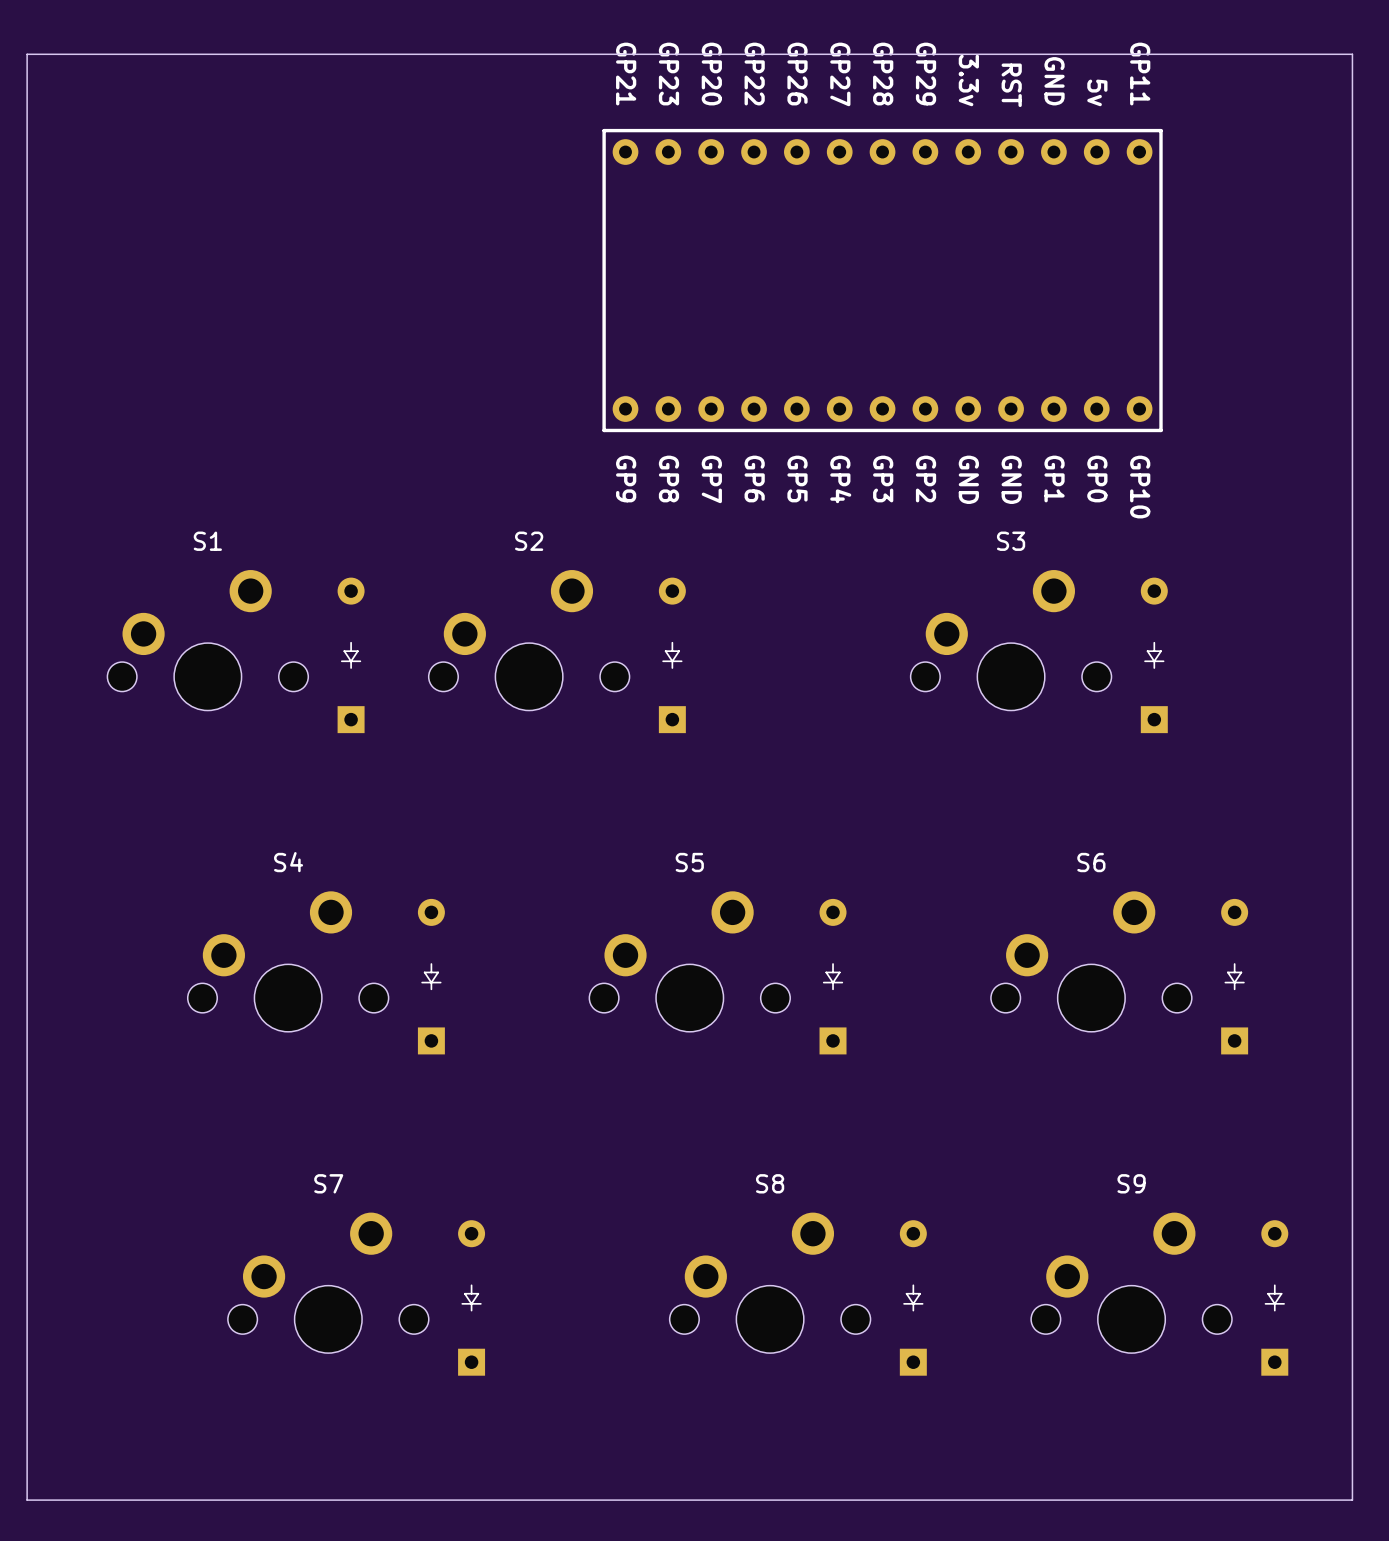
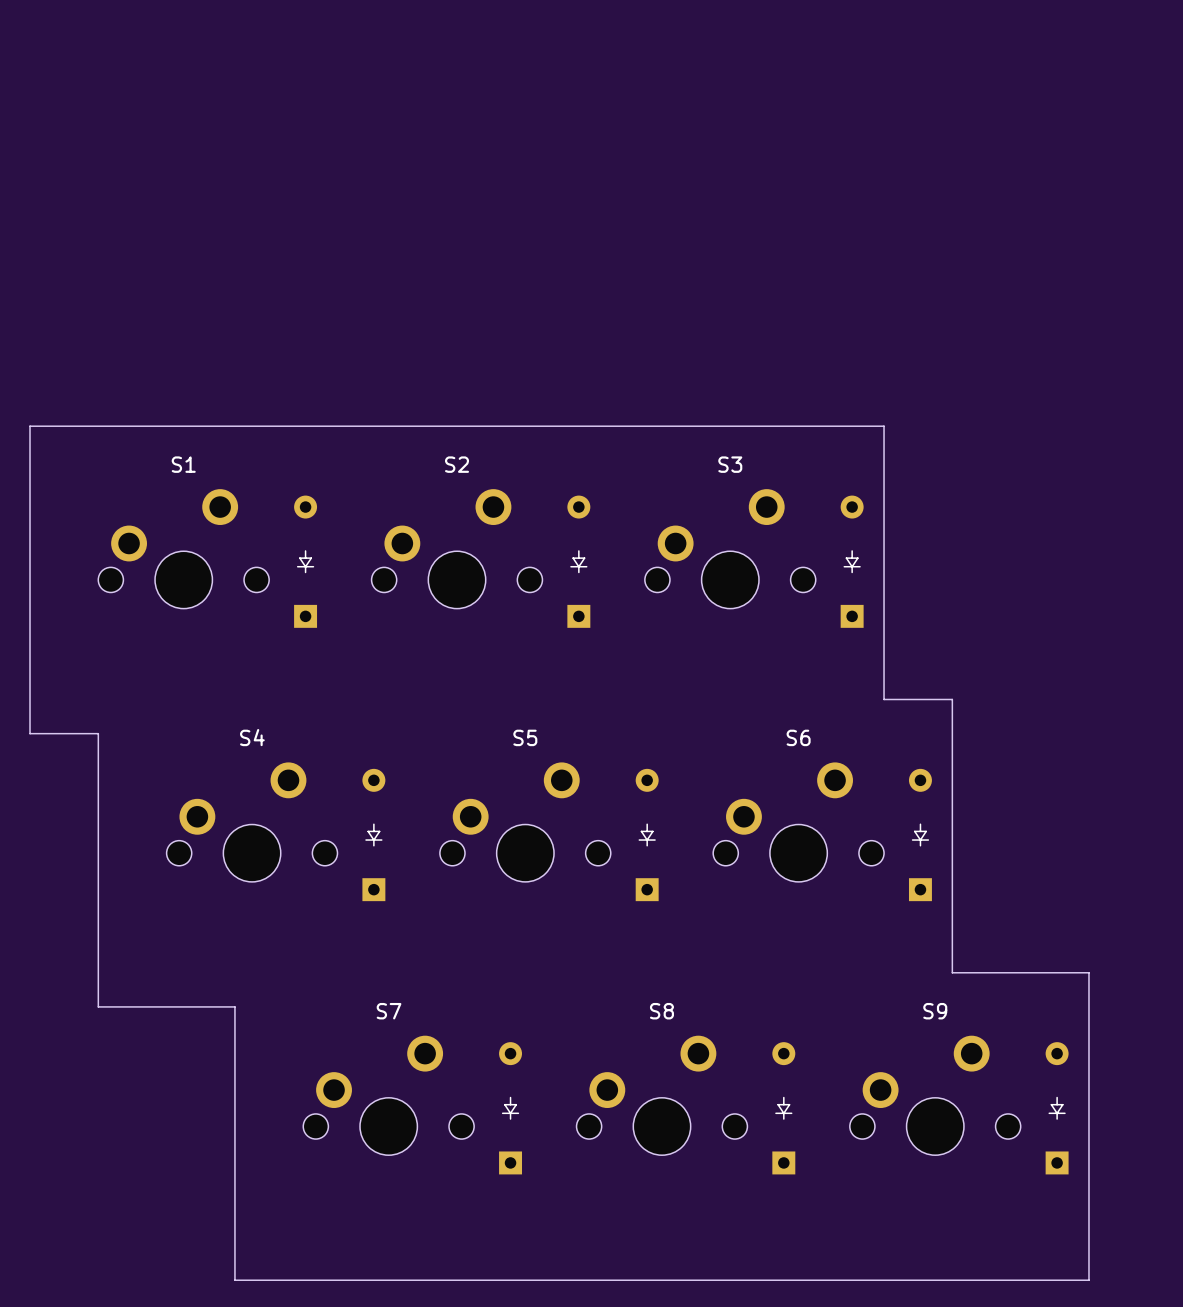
part: (882, 280) -> none
board edge: (27, 496) (27, 54) (1352, 54) (1352, 1500) (1272, 1500) -> (30, 426) (884, 426) (884, 699) (952, 699) (952, 972) (1088, 972) (1088, 1280)
S3 position: (1011, 640) -> (730, 548)
part position: (1154, 655) -> (852, 561)
board edge: (27, 857) (27, 1500) (268, 1500) -> (30, 733) (98, 733) (98, 1006) (234, 1006) (234, 1280)
S5 position: (689, 961) -> (525, 822)
S6 position: (1091, 961) -> (798, 822)
part position: (833, 976) -> (647, 835)
part: none -> (920, 835)
part: (1234, 976) -> none
S7 position: (328, 1282) -> (388, 1095)
S9 position: (1131, 1282) -> (935, 1095)
part position: (471, 1297) -> (510, 1108)
part position: (1274, 1297) -> (1057, 1108)

